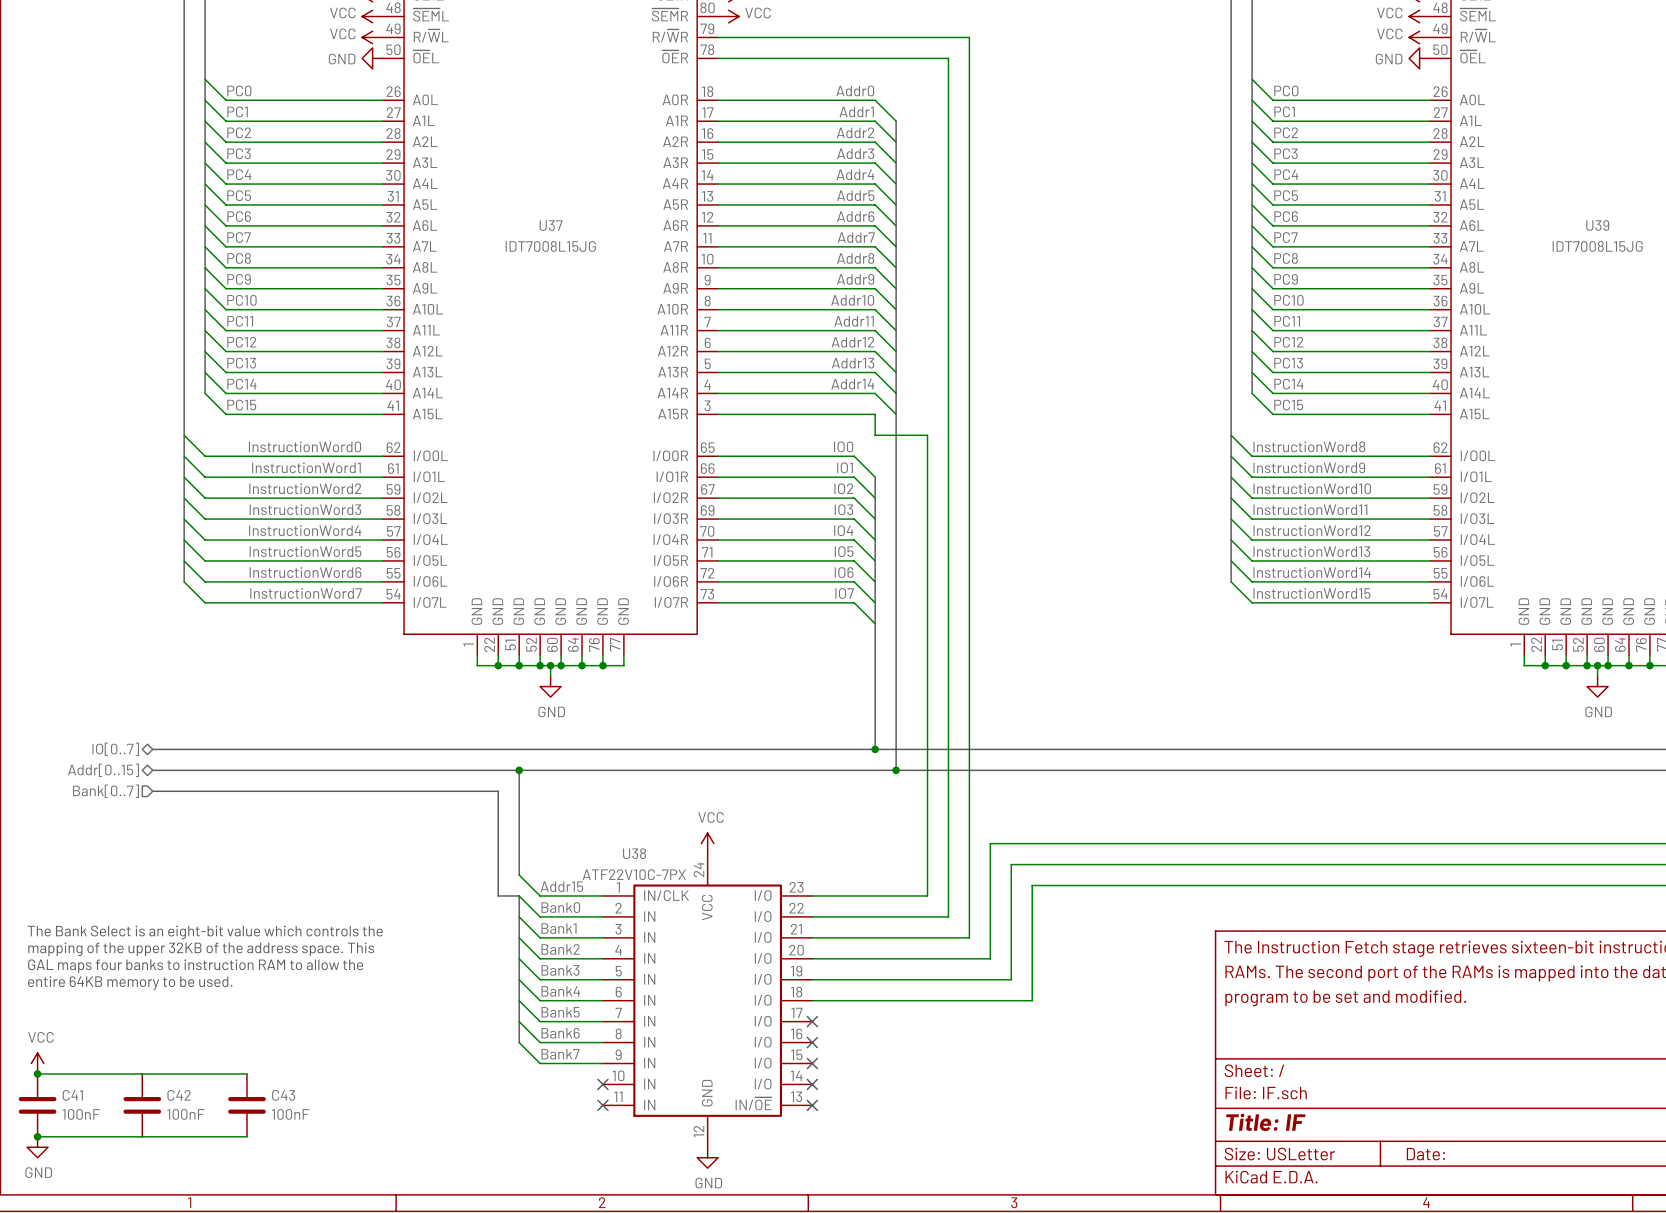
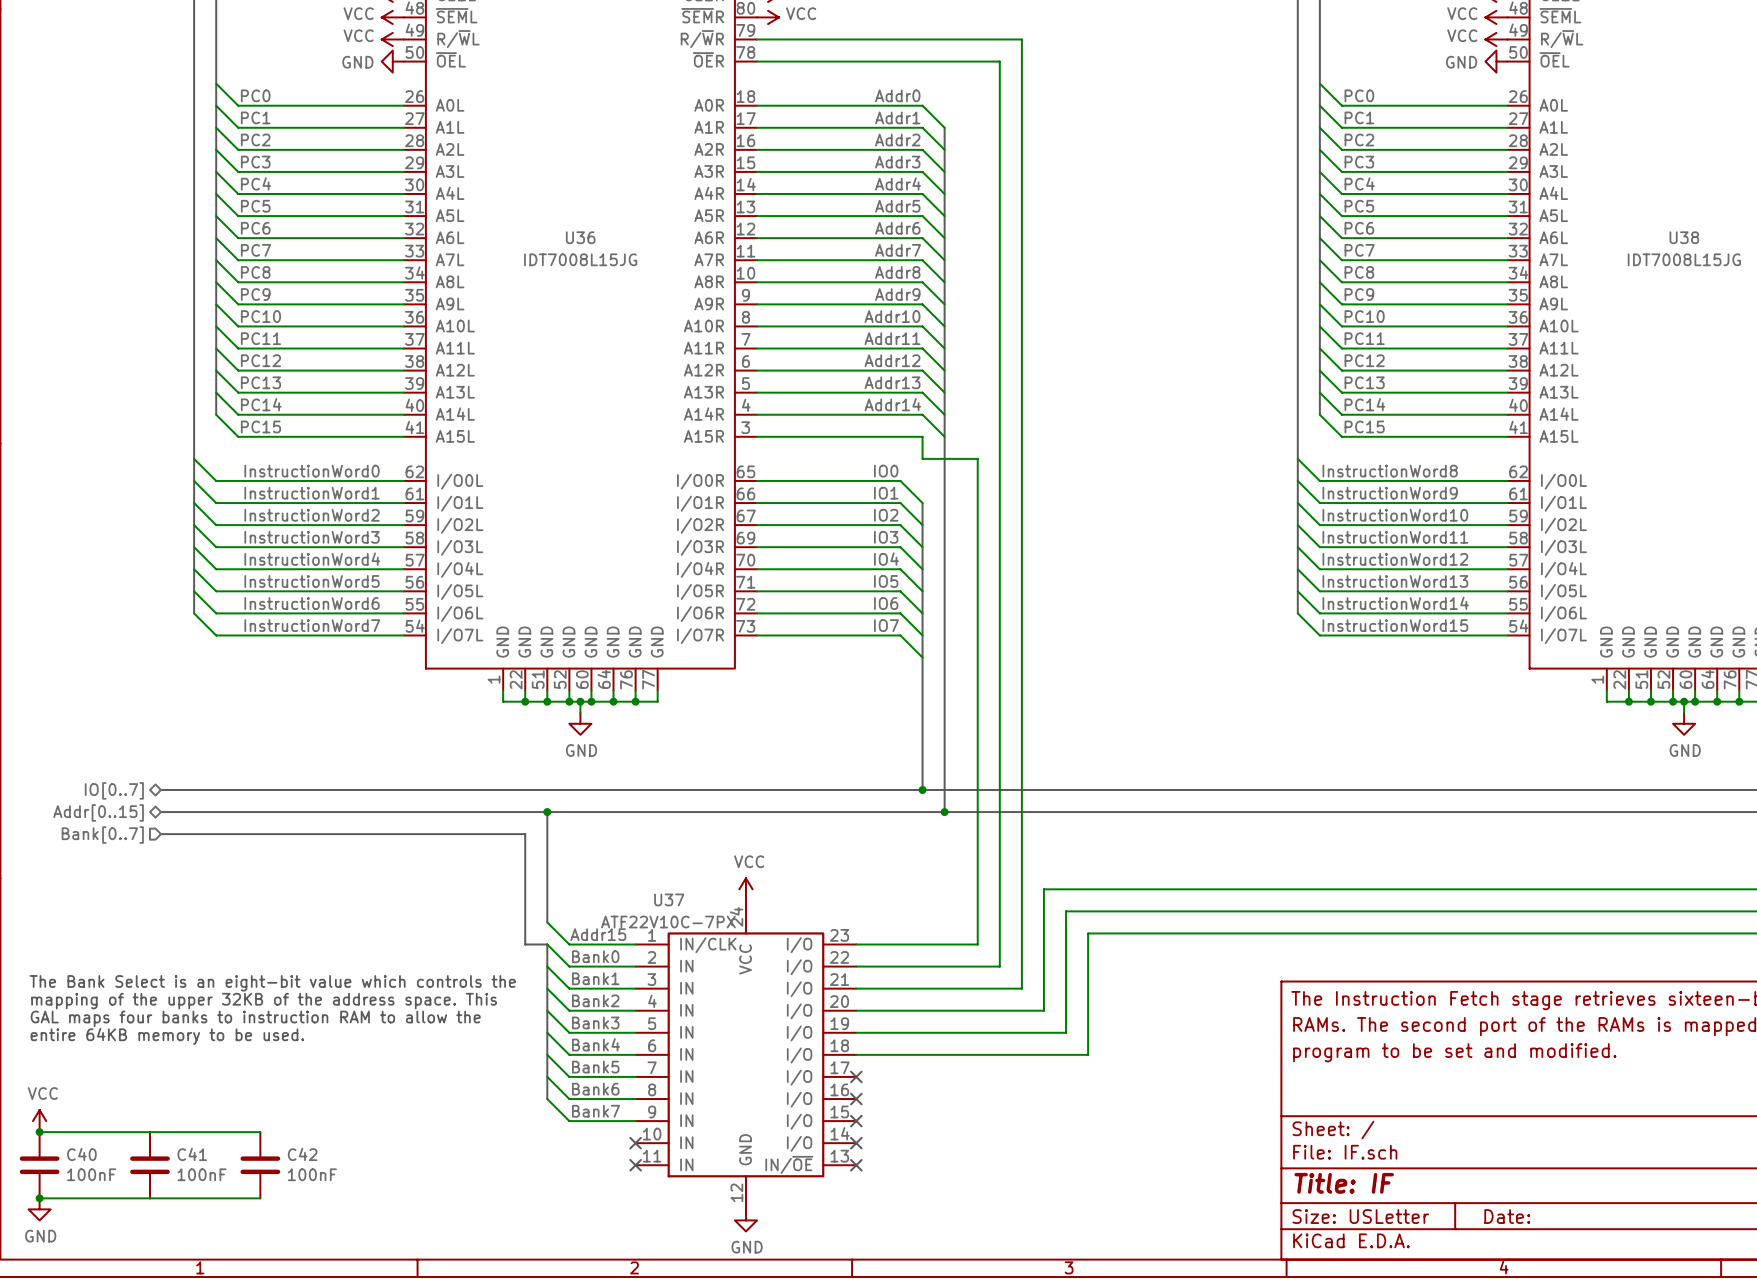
U37 name: U37 (551, 225) -> U36 (580, 237)
U39 name: U39 (1597, 225) -> U38 (1684, 237)
U38 name: U38 (634, 853) -> U37 (669, 899)
C41 name: C41 (72, 1095) -> C40 (81, 1154)
C42 name: C42 (179, 1095) -> C41 (192, 1154)
C43 name: C43 (283, 1095) -> C42 (302, 1154)

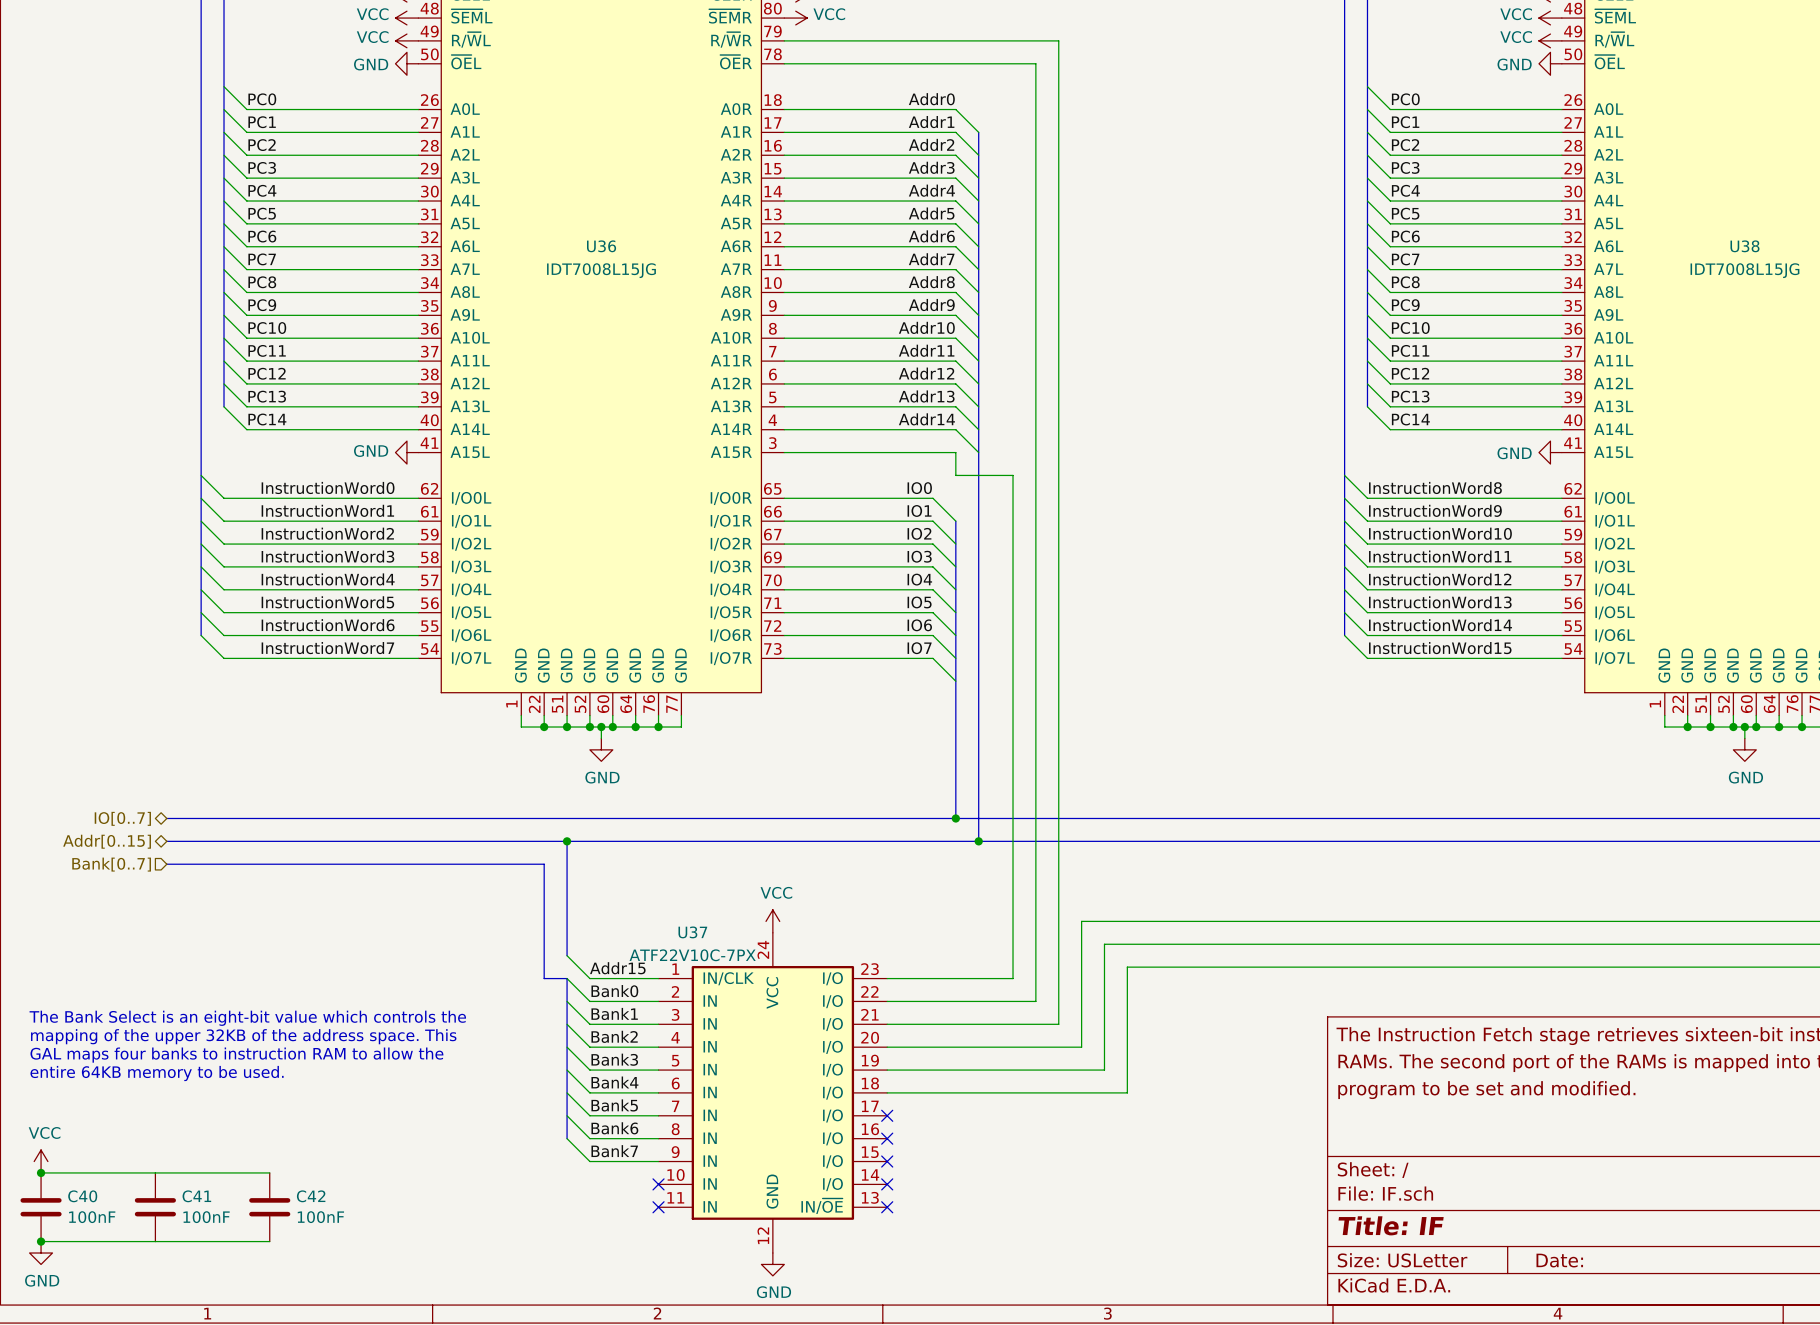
bus: (216, 392) (216, 414) -> none
bus: (1319, 392) (1319, 414) -> none
wire: (216, 414) (238, 436) (403, 436) -> none
wire: (1319, 414) (1341, 436) (1507, 436) -> none
label: PC15 (260, 426) -> none
label: PC15 (1364, 426) -> none
power symbol: none -> GND (406, 452)
power symbol: none -> GND (1550, 452)

